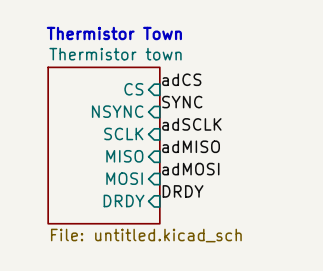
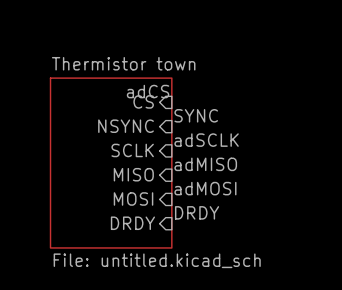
text: Thermistor Town (114, 33) -> none
label position: adCS (181, 79) -> adCS (148, 91)

